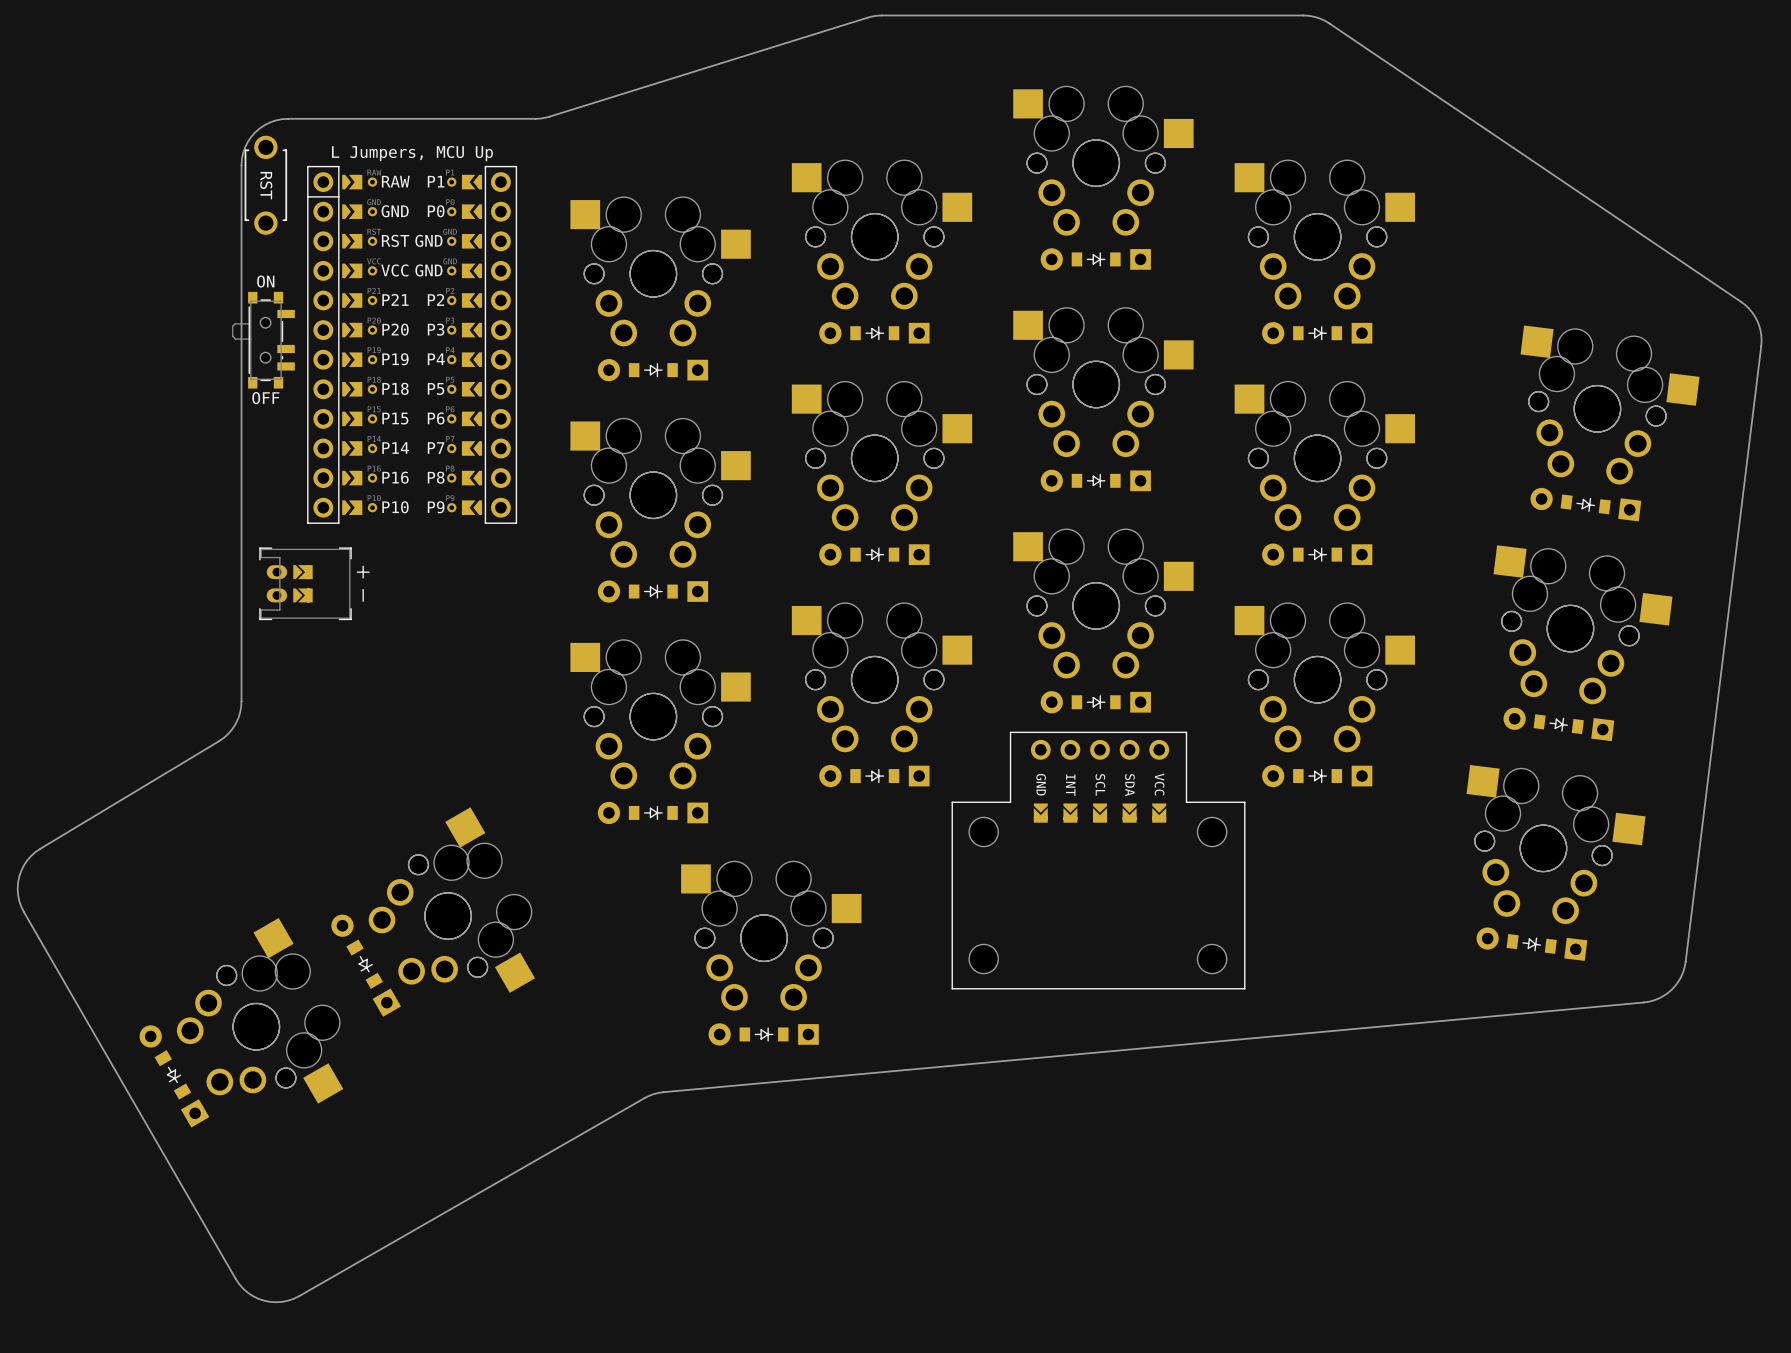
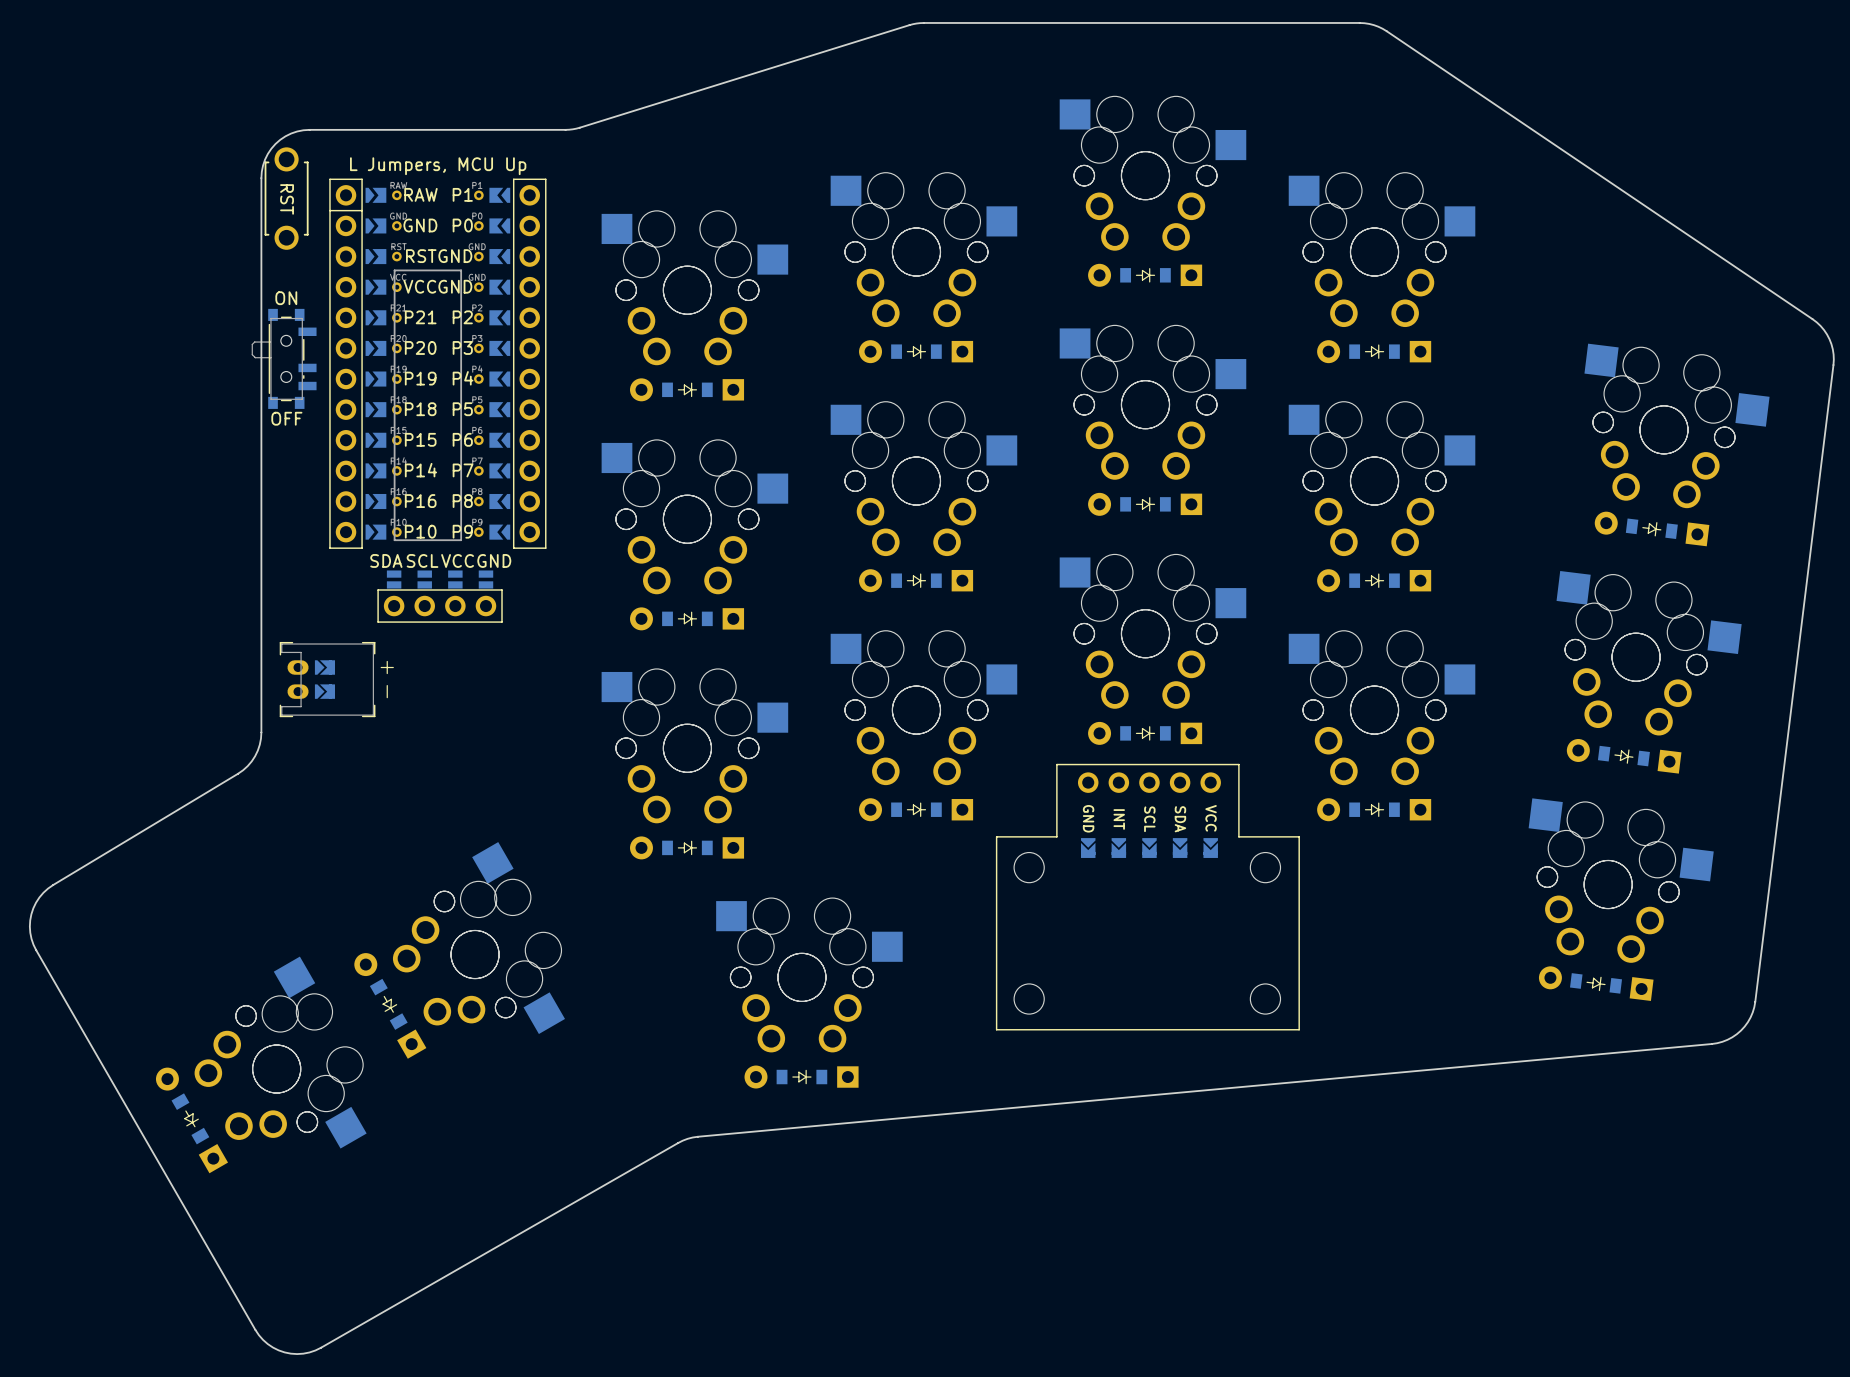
part: none -> (440, 446)
part position: (314, 583) -> (336, 679)

